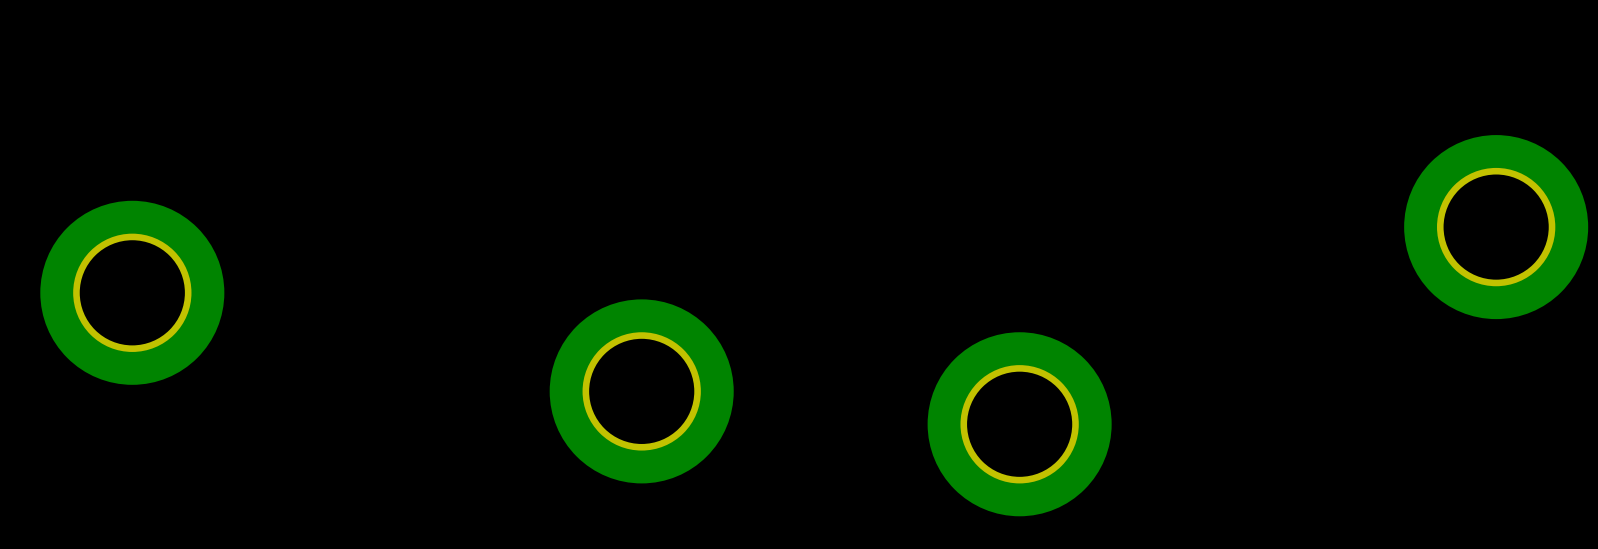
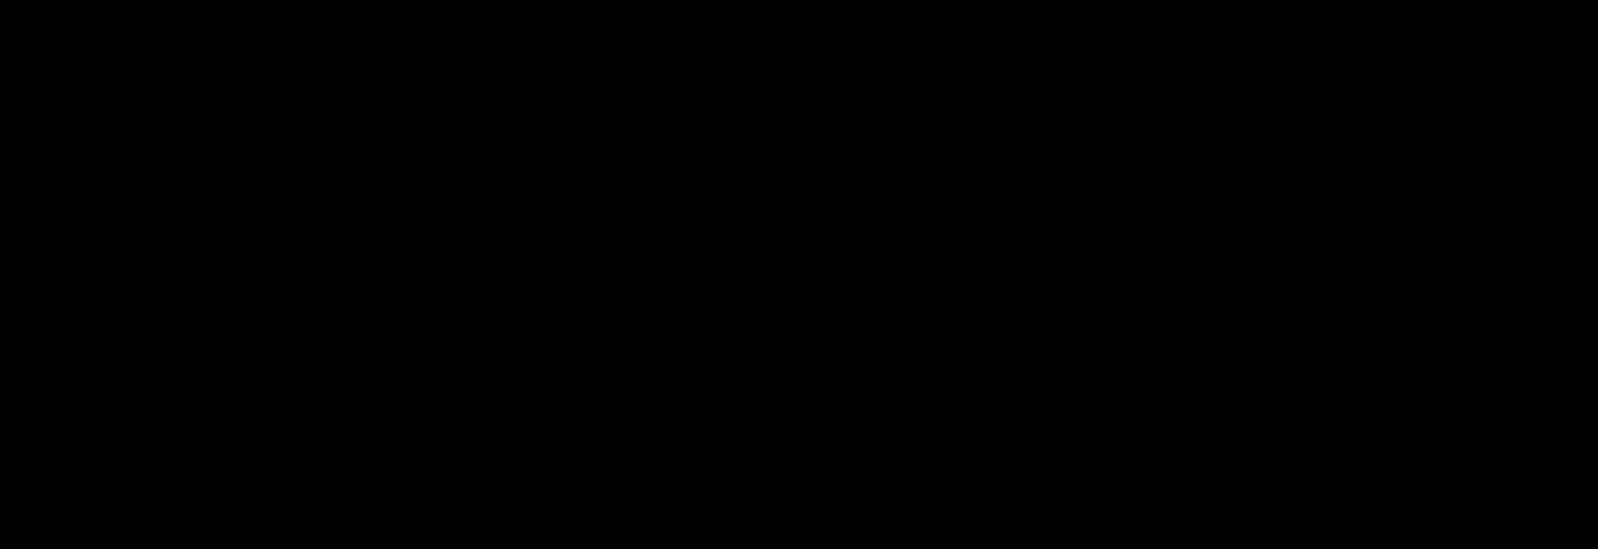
part: (1496, 227) -> none
part: (132, 292) -> none
part: (641, 391) -> none
part: (1019, 424) -> none

